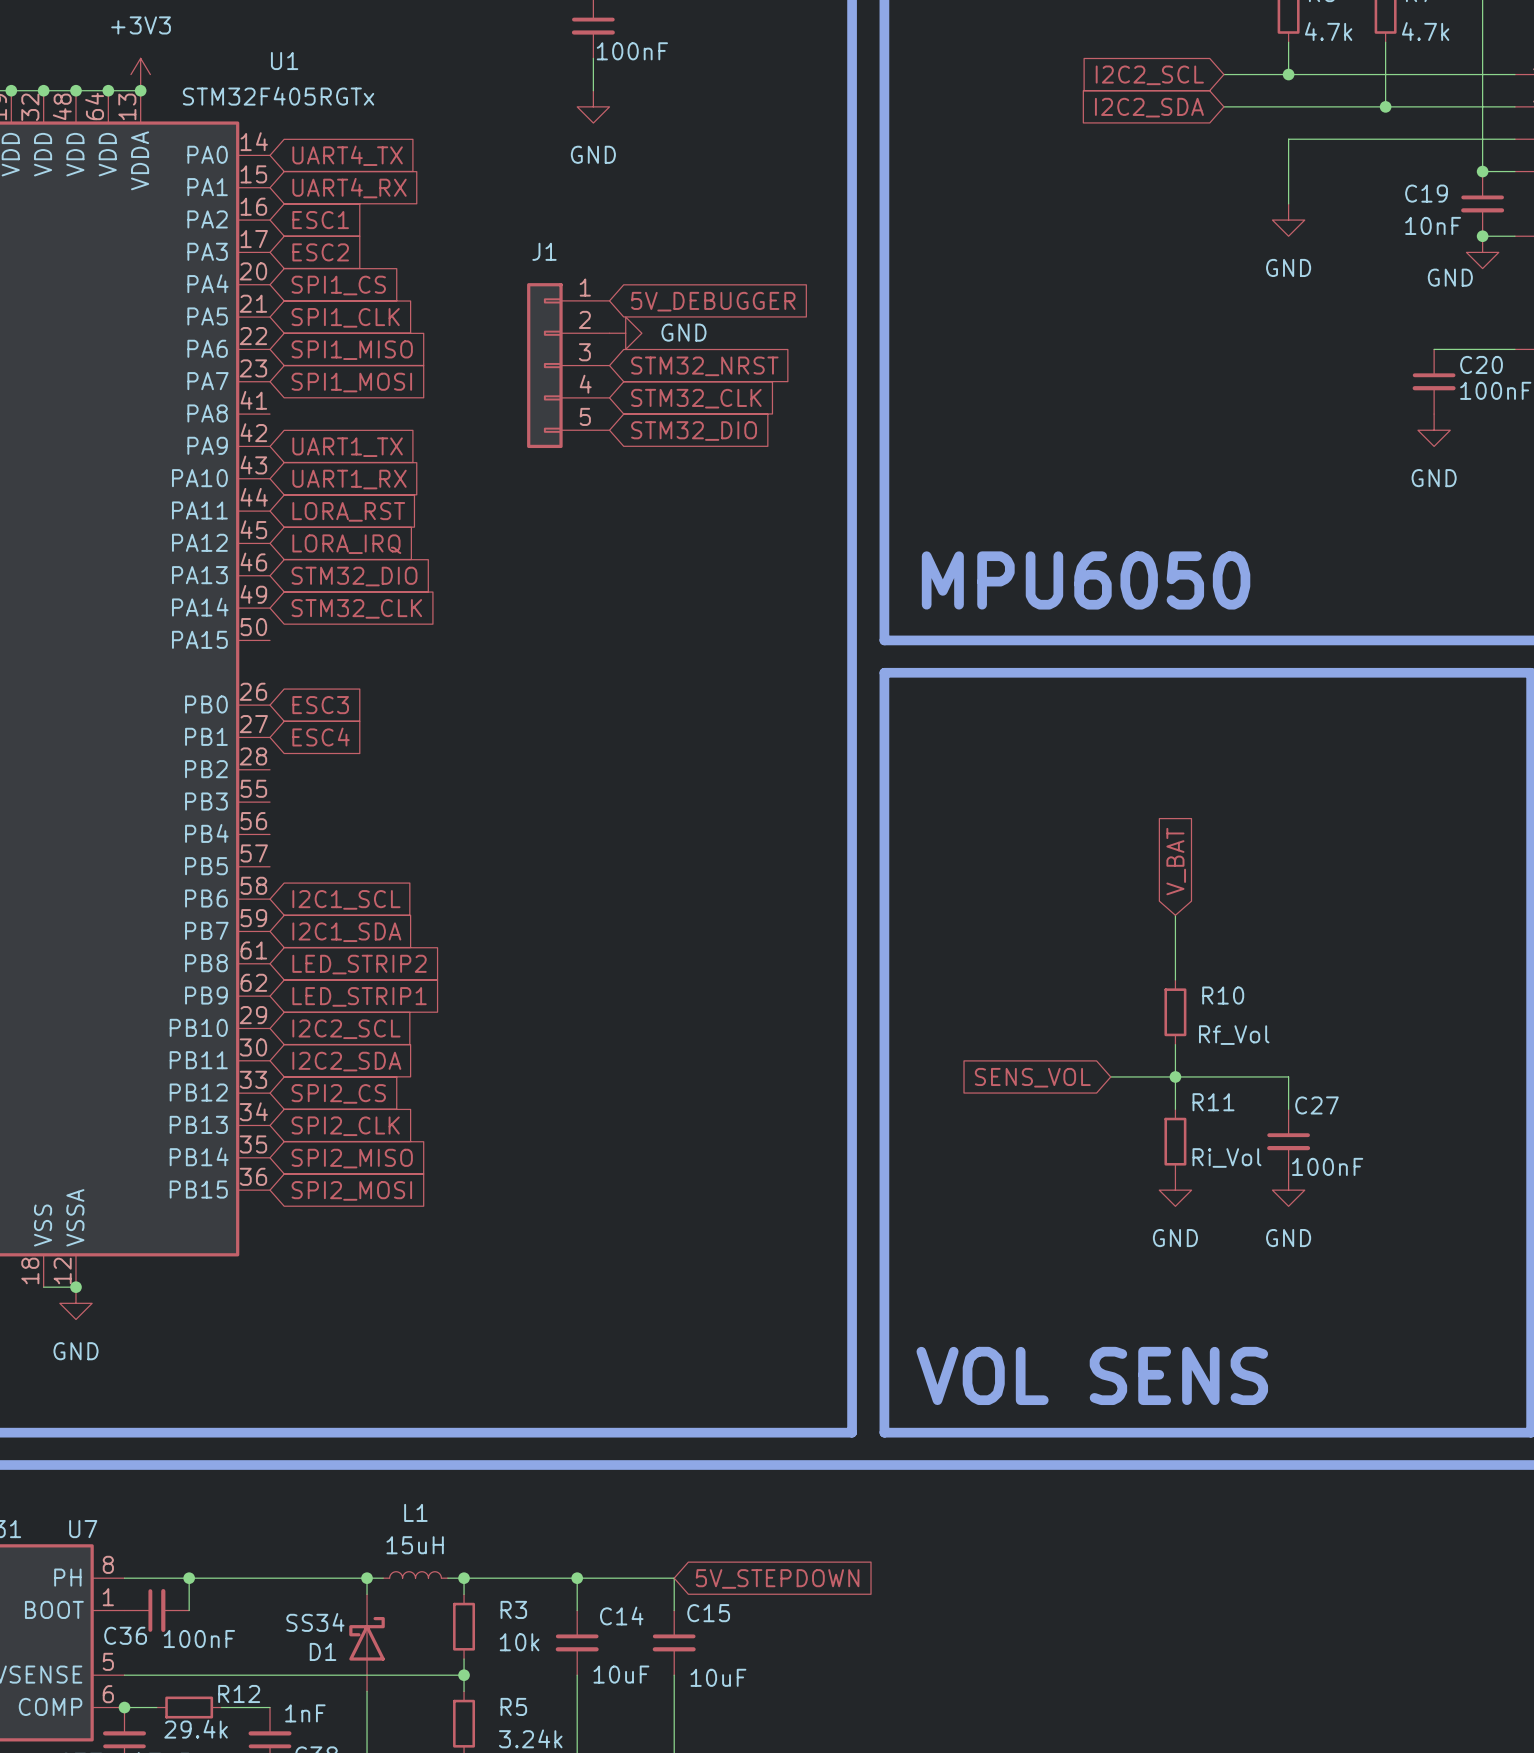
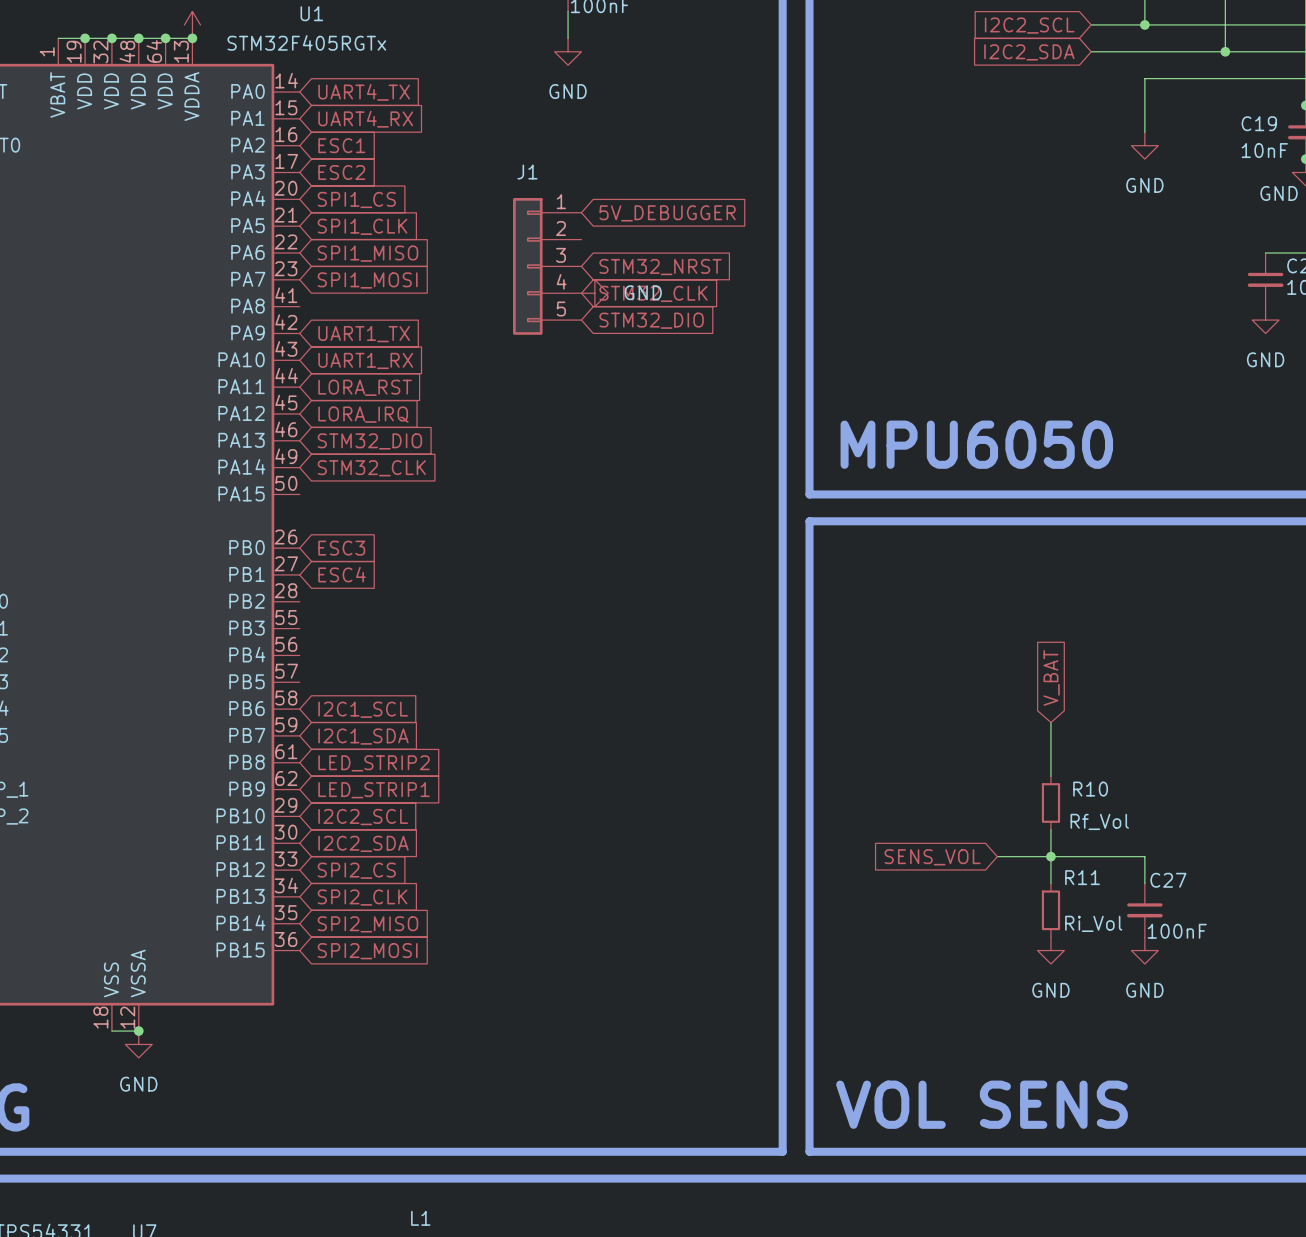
power symbol position: GND (625, 333) -> GND (594, 293)

